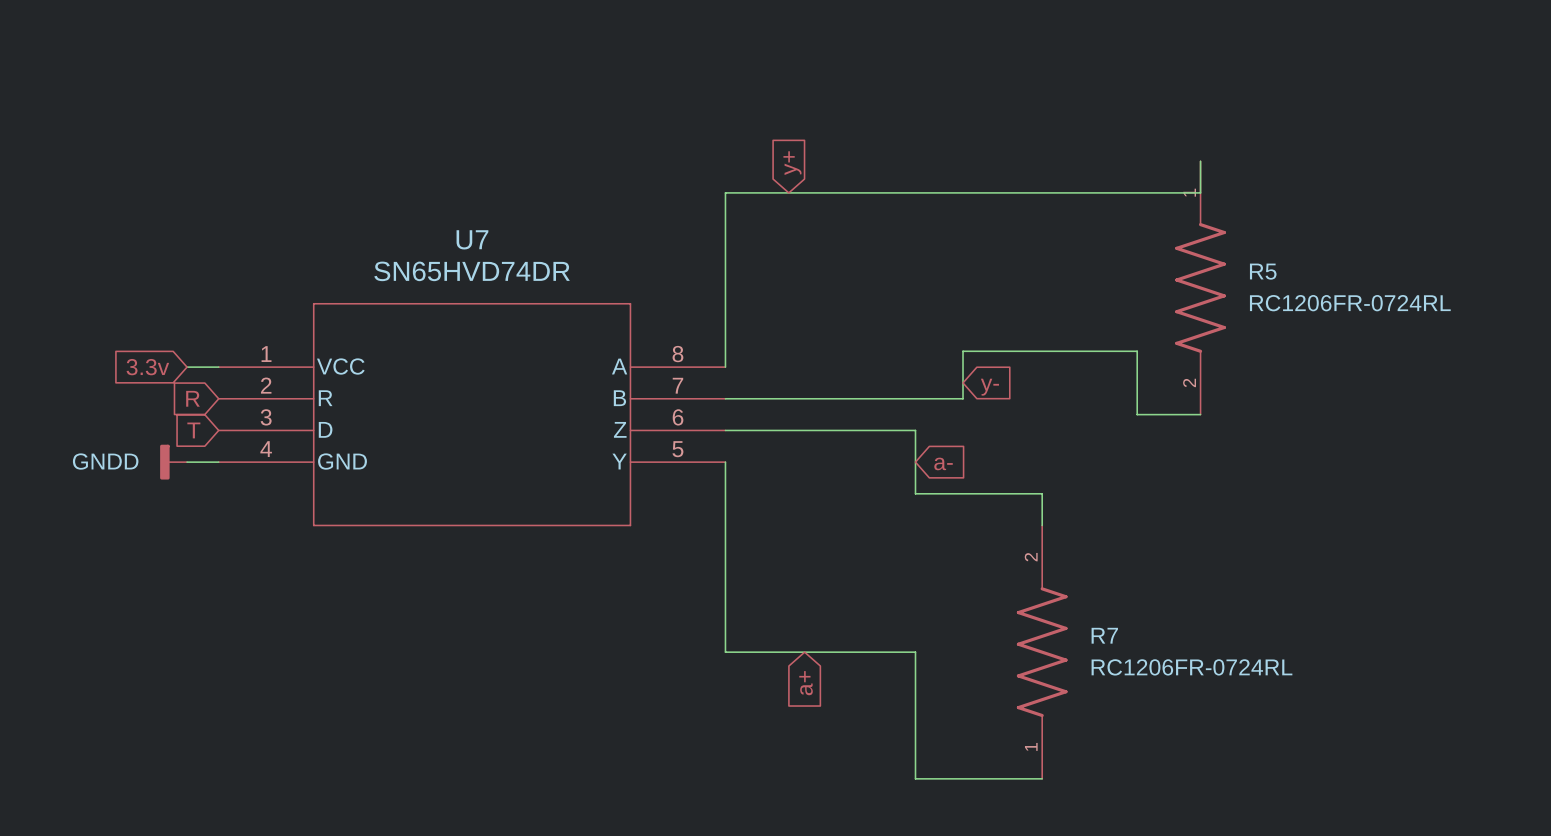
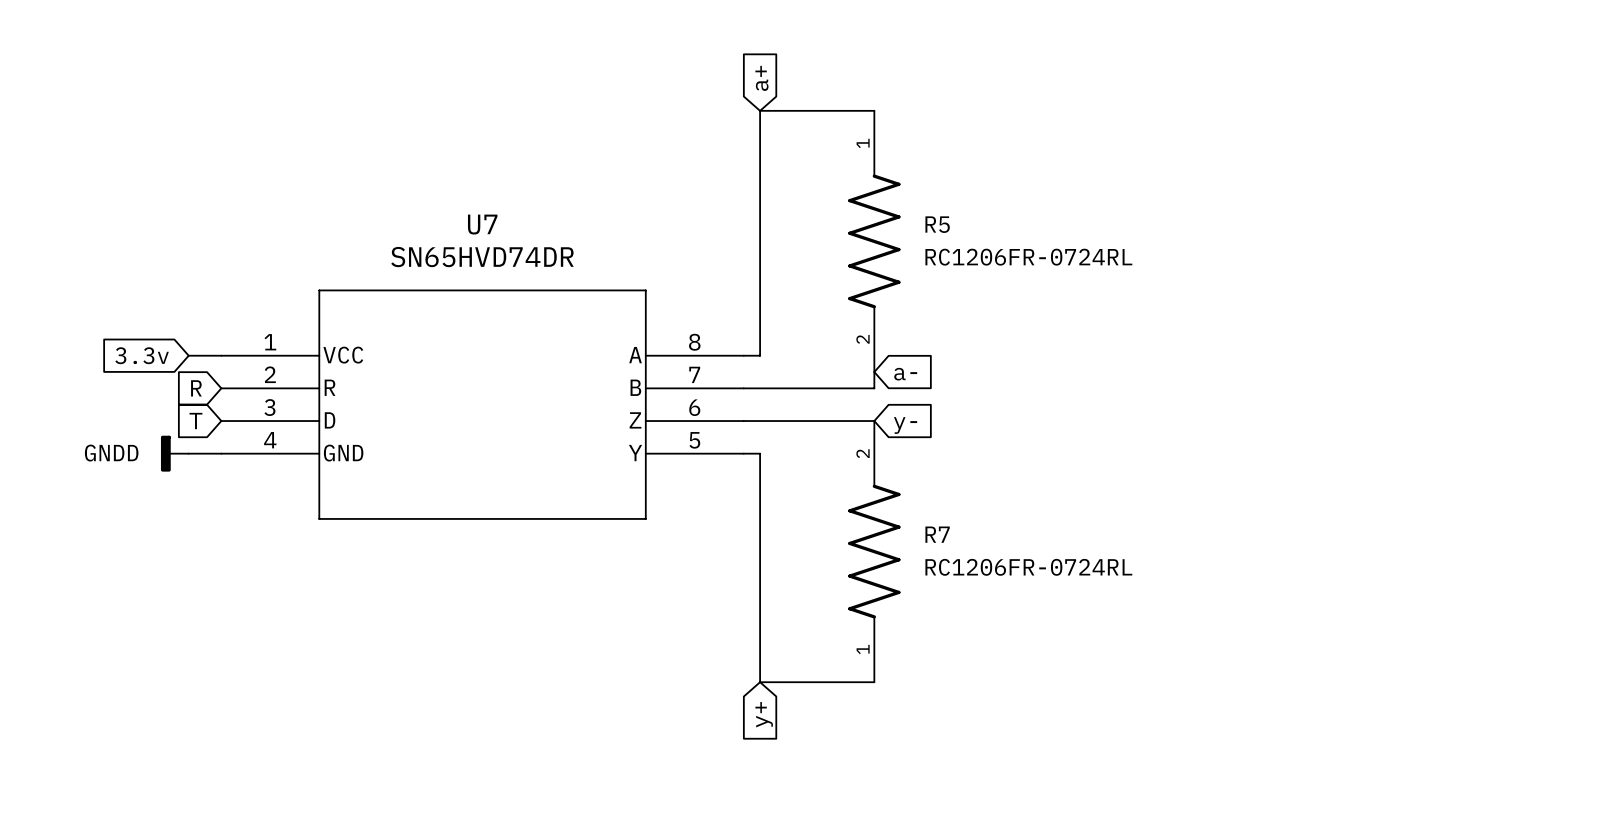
global label: none -> a+ (761, 78)
wire: (1200, 161) (1200, 192) (725, 192) (725, 367) -> (874, 110) (760, 110) (760, 355) (743, 355)
global label: y+ (792, 163) -> none
R5 position: (1200, 287) -> (874, 241)
global label position: y- (989, 387) -> y- (905, 425)
wire: (852, 398) (963, 398) (963, 351) (1137, 351) (1137, 414) (1200, 414) -> (874, 388) (874, 372)
wire: (852, 430) (915, 430) (915, 493) (1042, 493) (1042, 525) -> none
wire: (725, 462) (725, 652) (915, 652) (915, 778) (1042, 778) -> (743, 453) (760, 453) (760, 682) (874, 682)
global label position: a- (943, 463) -> a- (905, 374)
R7 position: (1042, 652) -> (874, 551)
global label: a+ (806, 683) -> none
global label: none -> y+ (764, 714)

